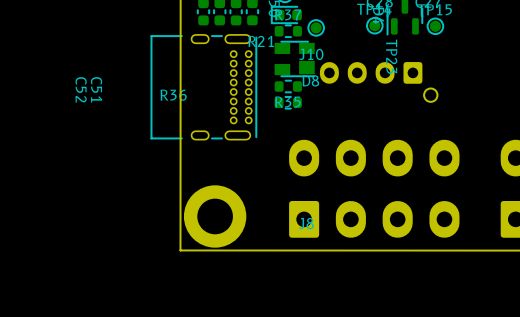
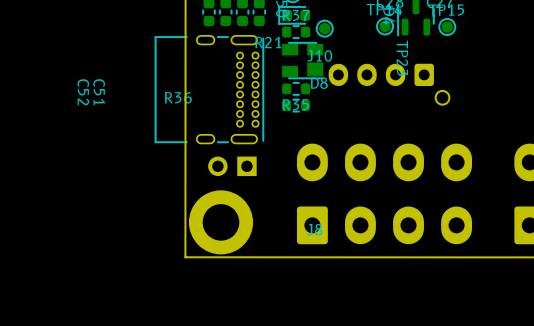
part: none -> (232, 166)

